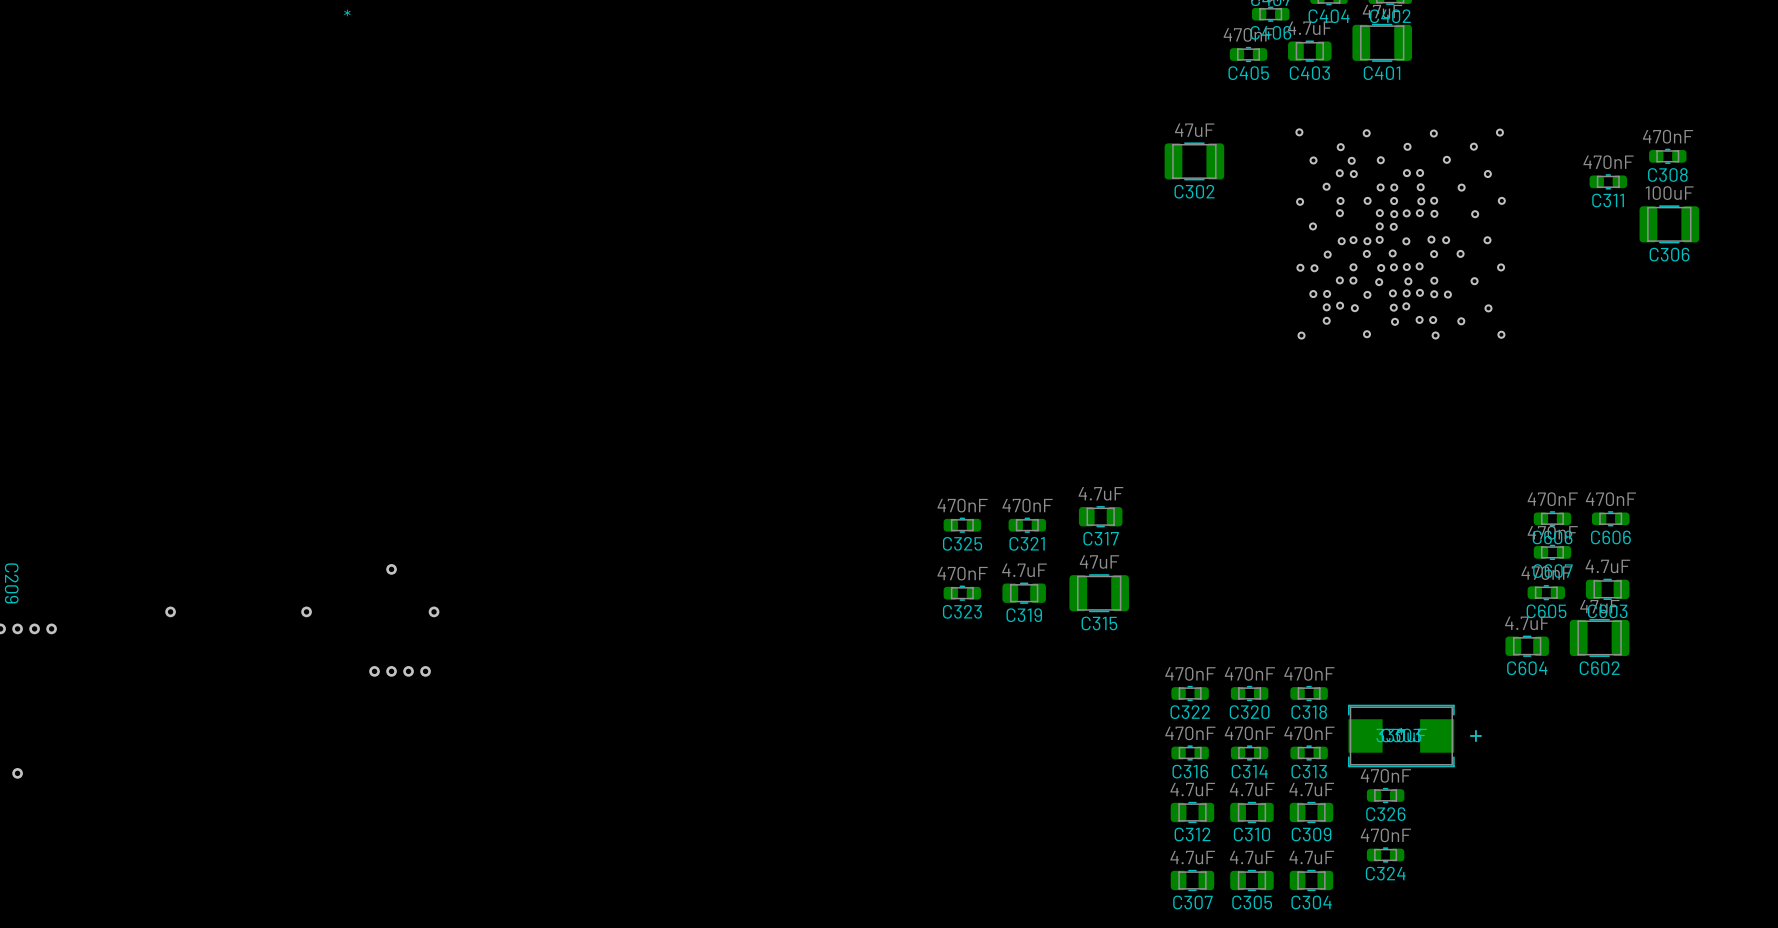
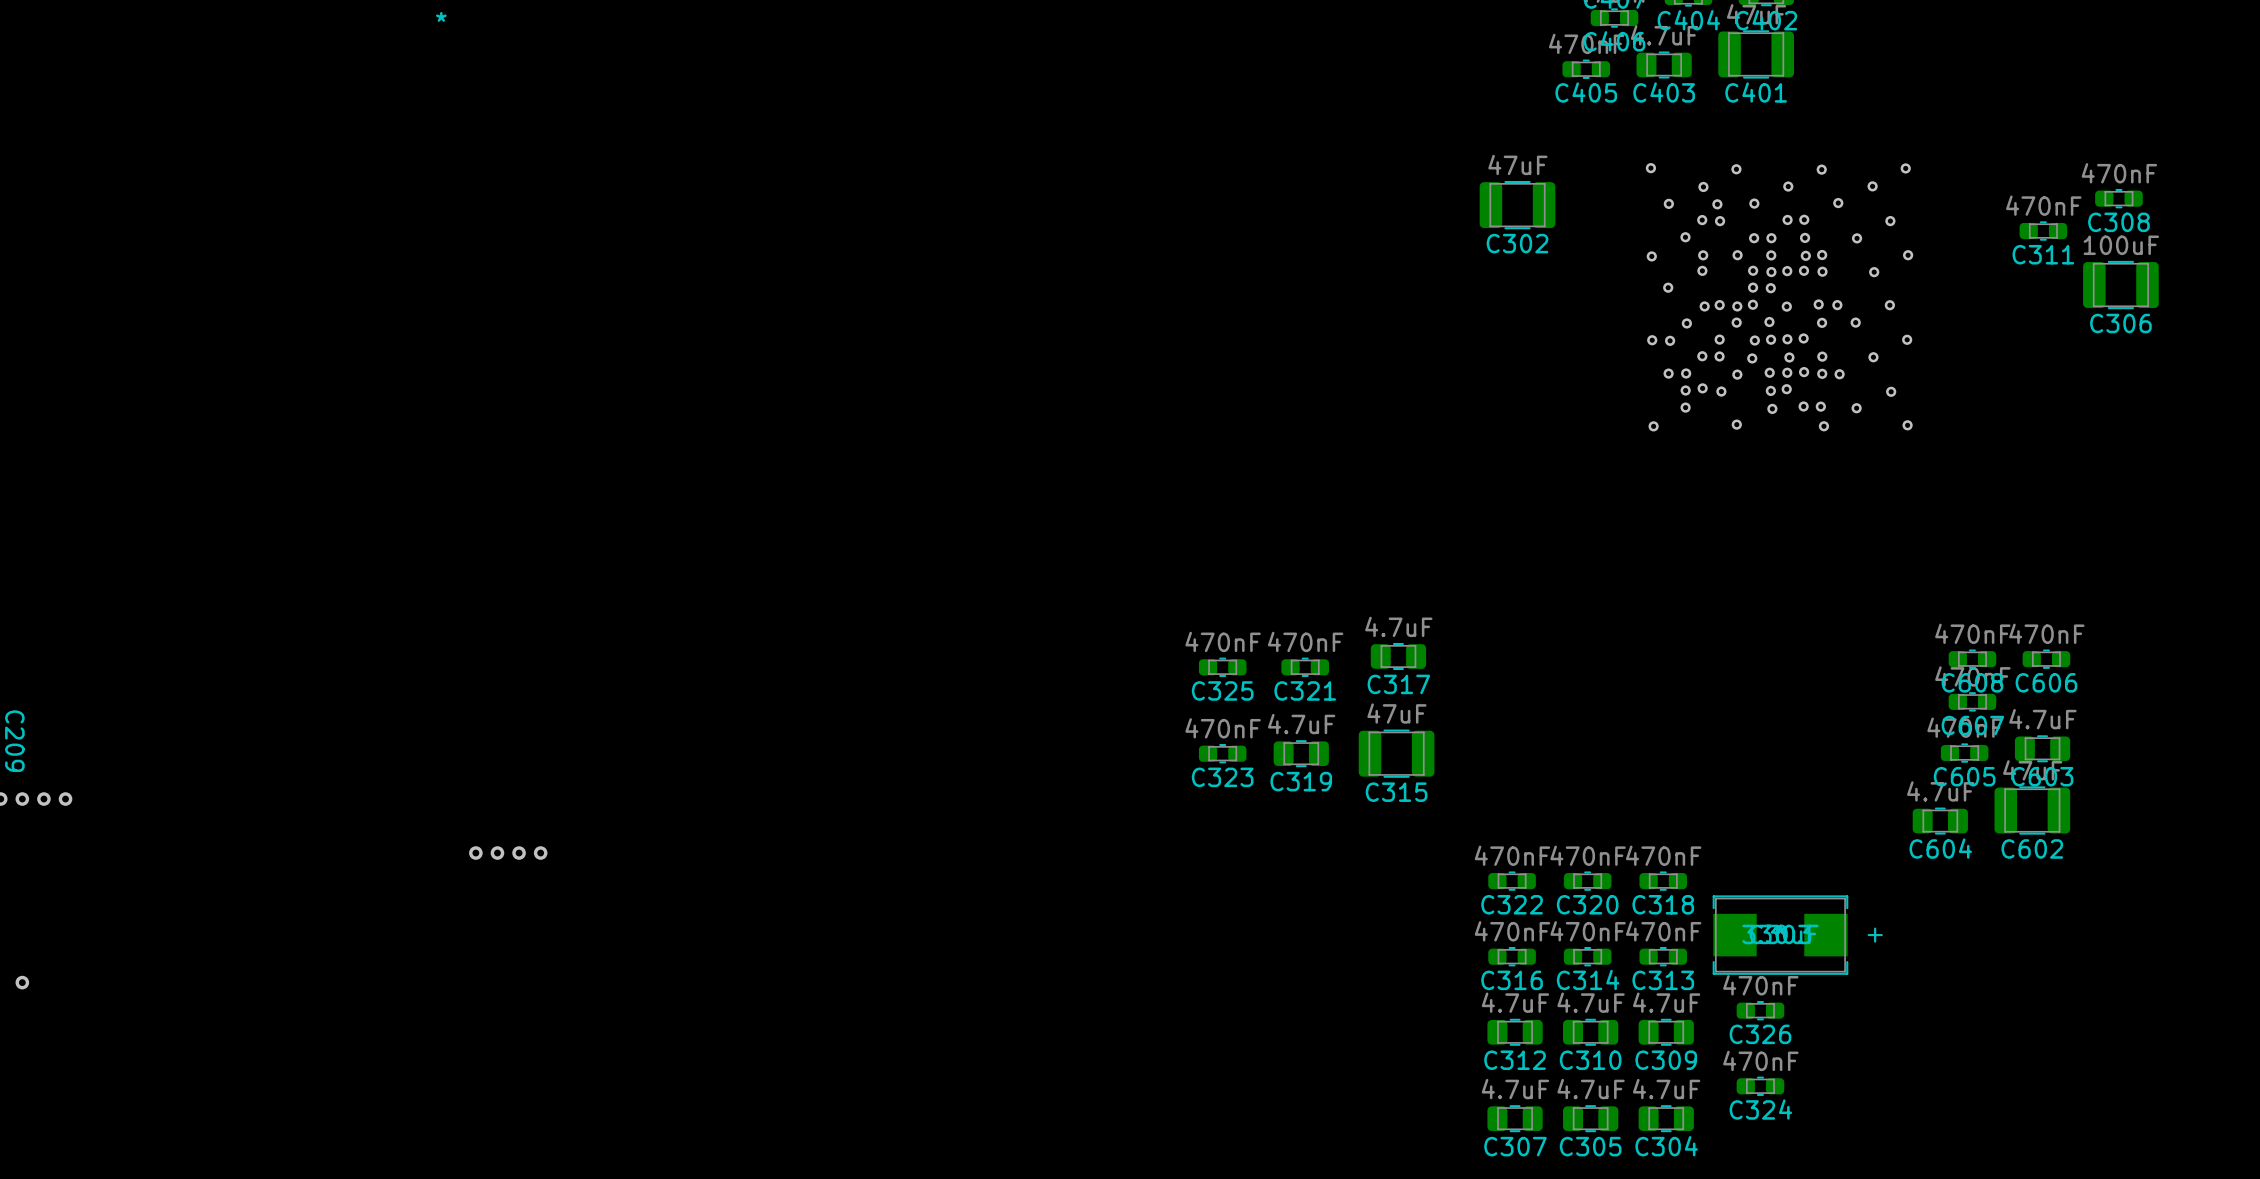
via: (391, 569) -> none
via: (170, 611) -> none
via: (306, 611) -> none
via: (434, 611) -> none

